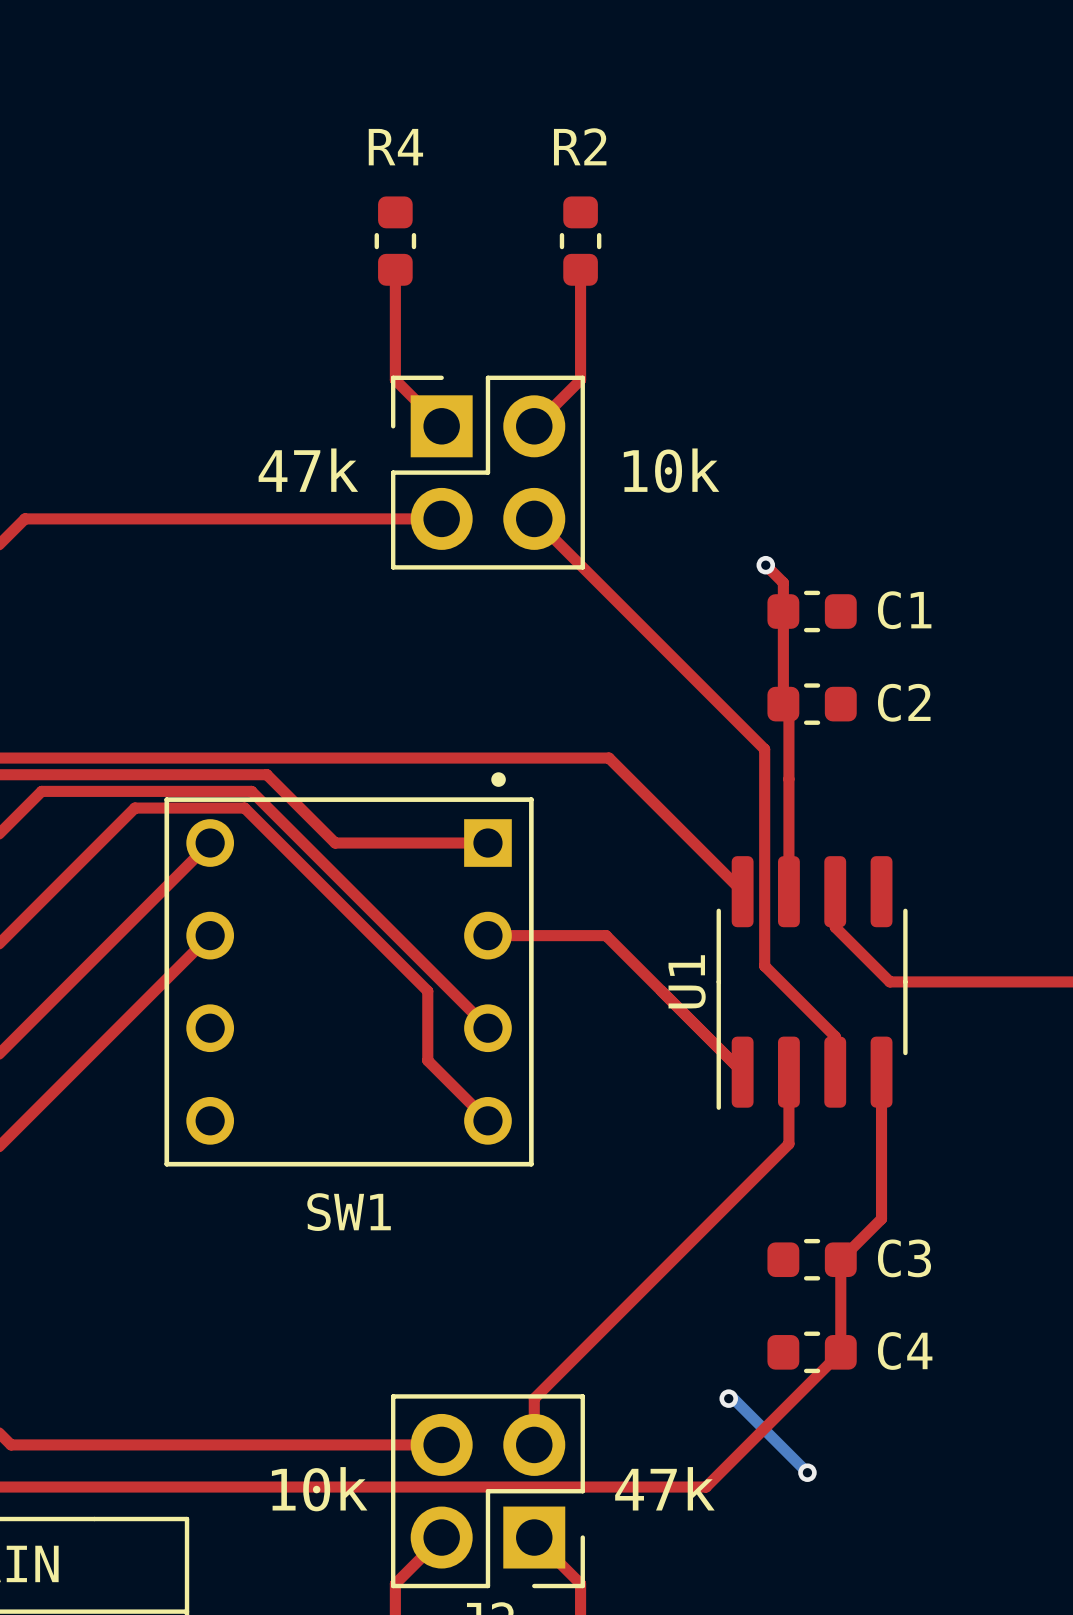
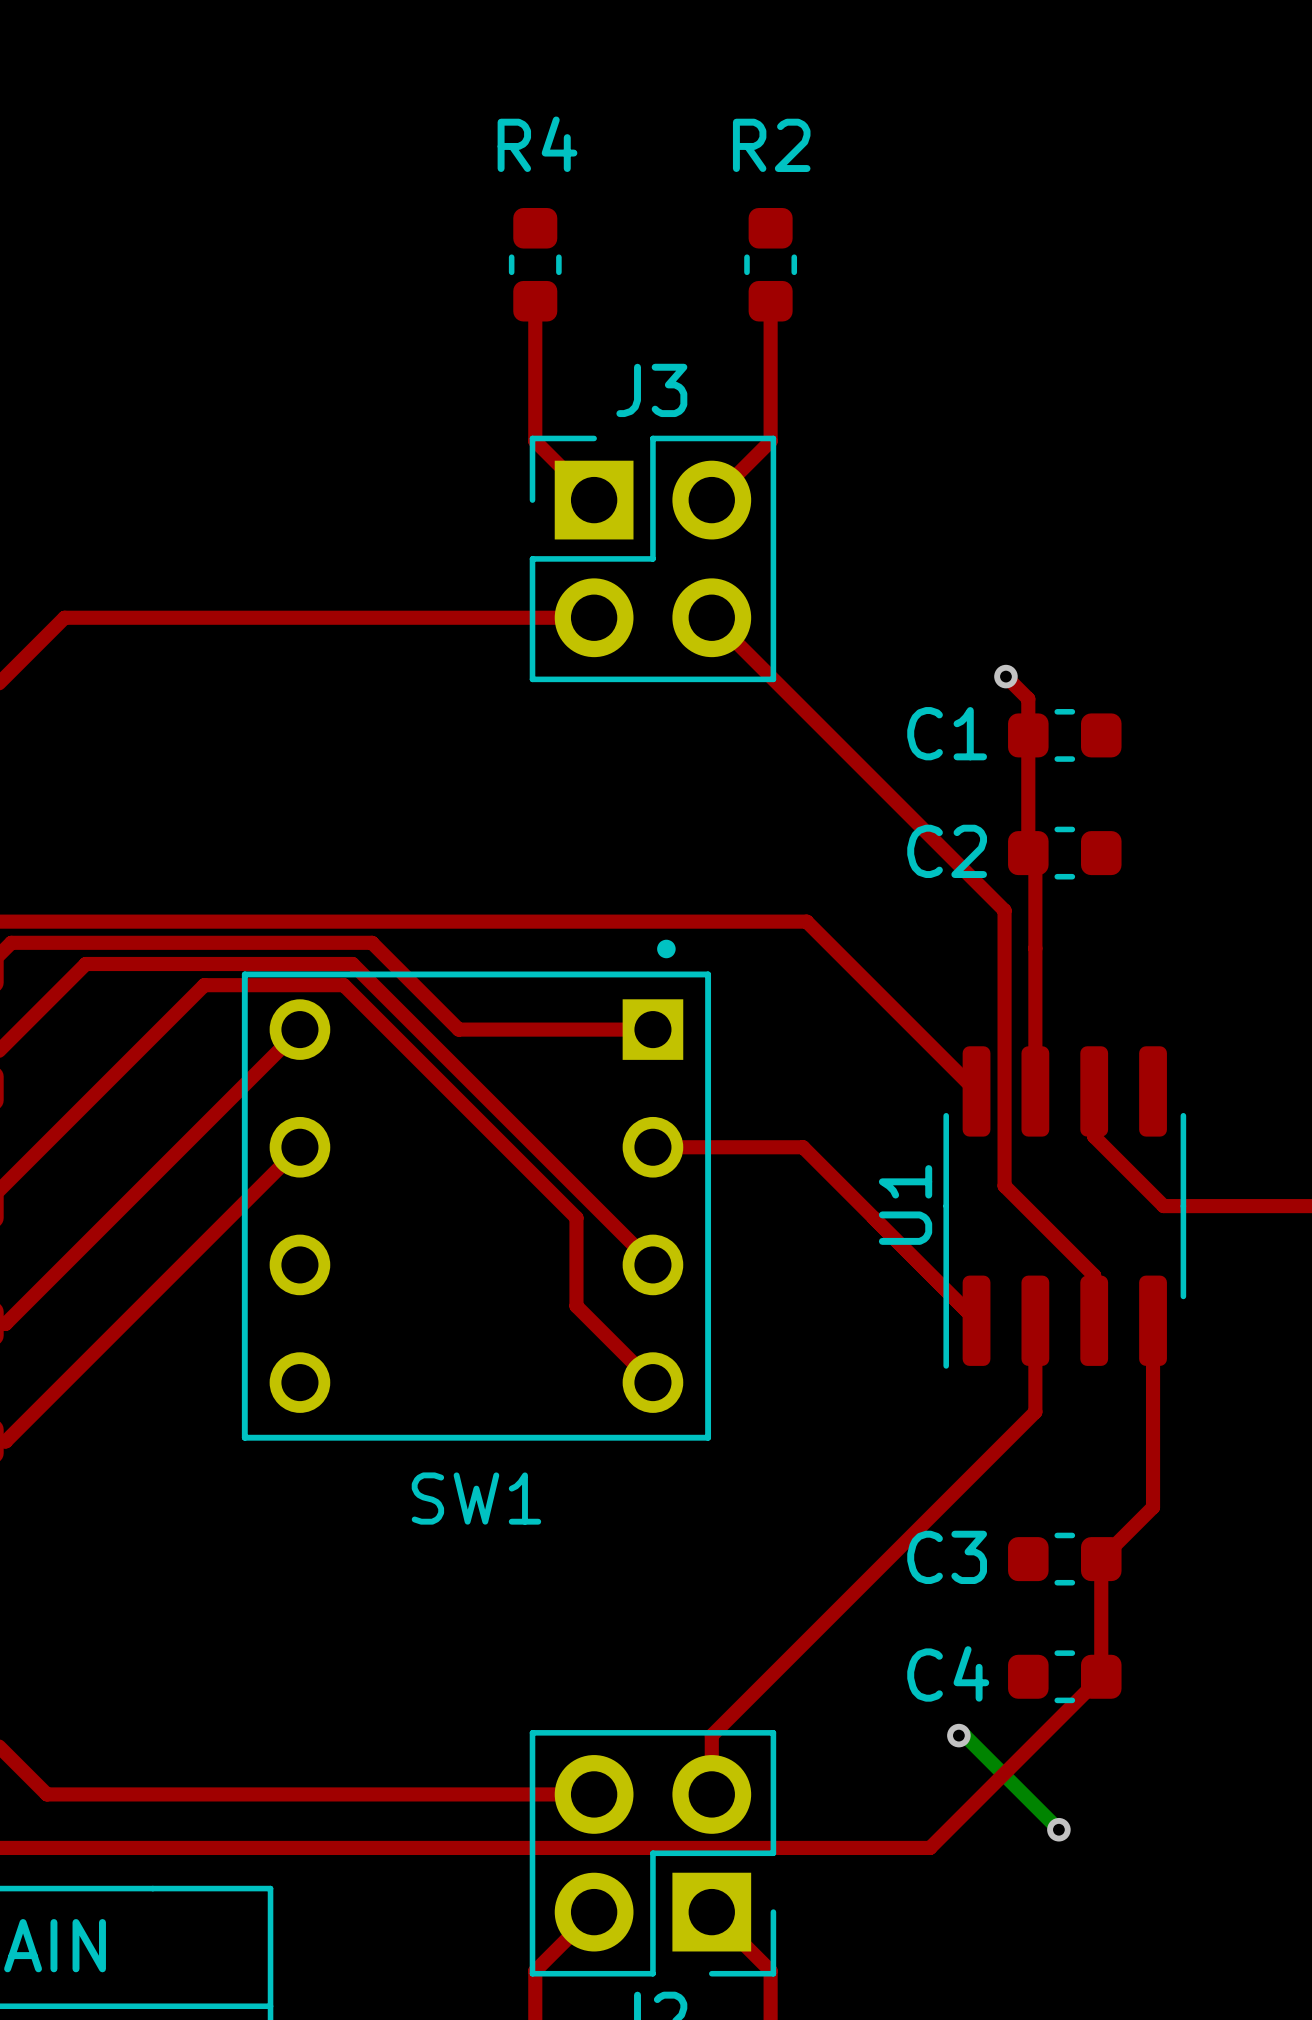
J3 name: none -> J3 (651, 390)
text: 47k (308, 470) -> none
text: 10k (671, 470) -> none
C1 name position: C1 (904, 610) -> C1 (947, 733)
C2 name position: C2 (904, 702) -> C2 (947, 851)
C3 name position: C3 (904, 1258) -> C3 (947, 1557)
C4 name position: C4 (905, 1350) -> C4 (948, 1673)
text: 47k (664, 1488) -> none
text: 10k (319, 1489) -> none

